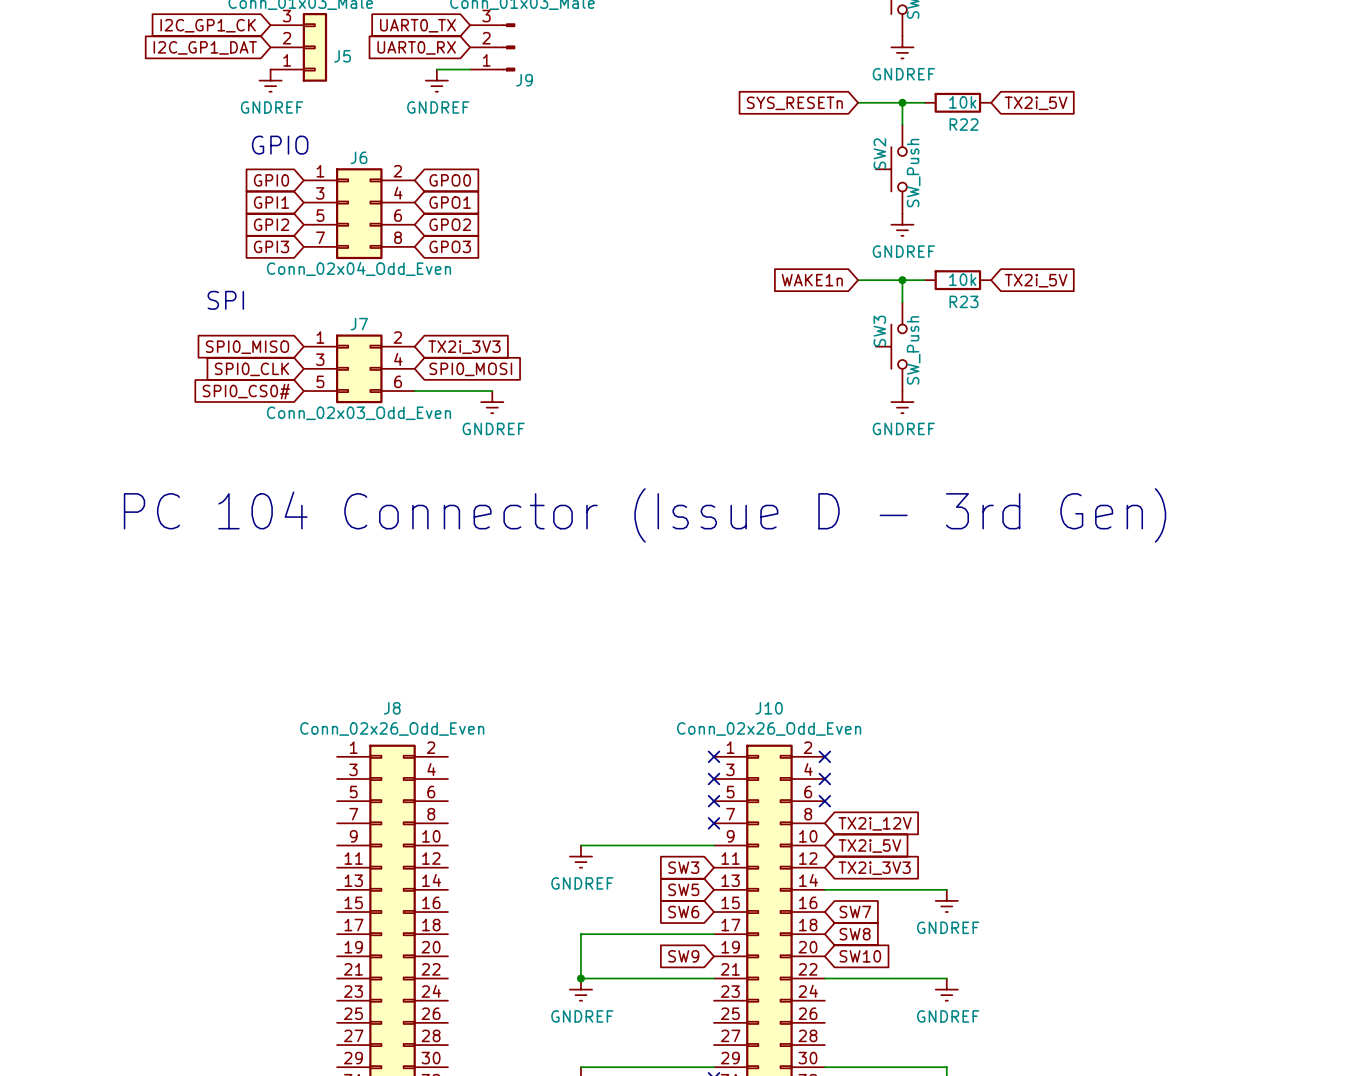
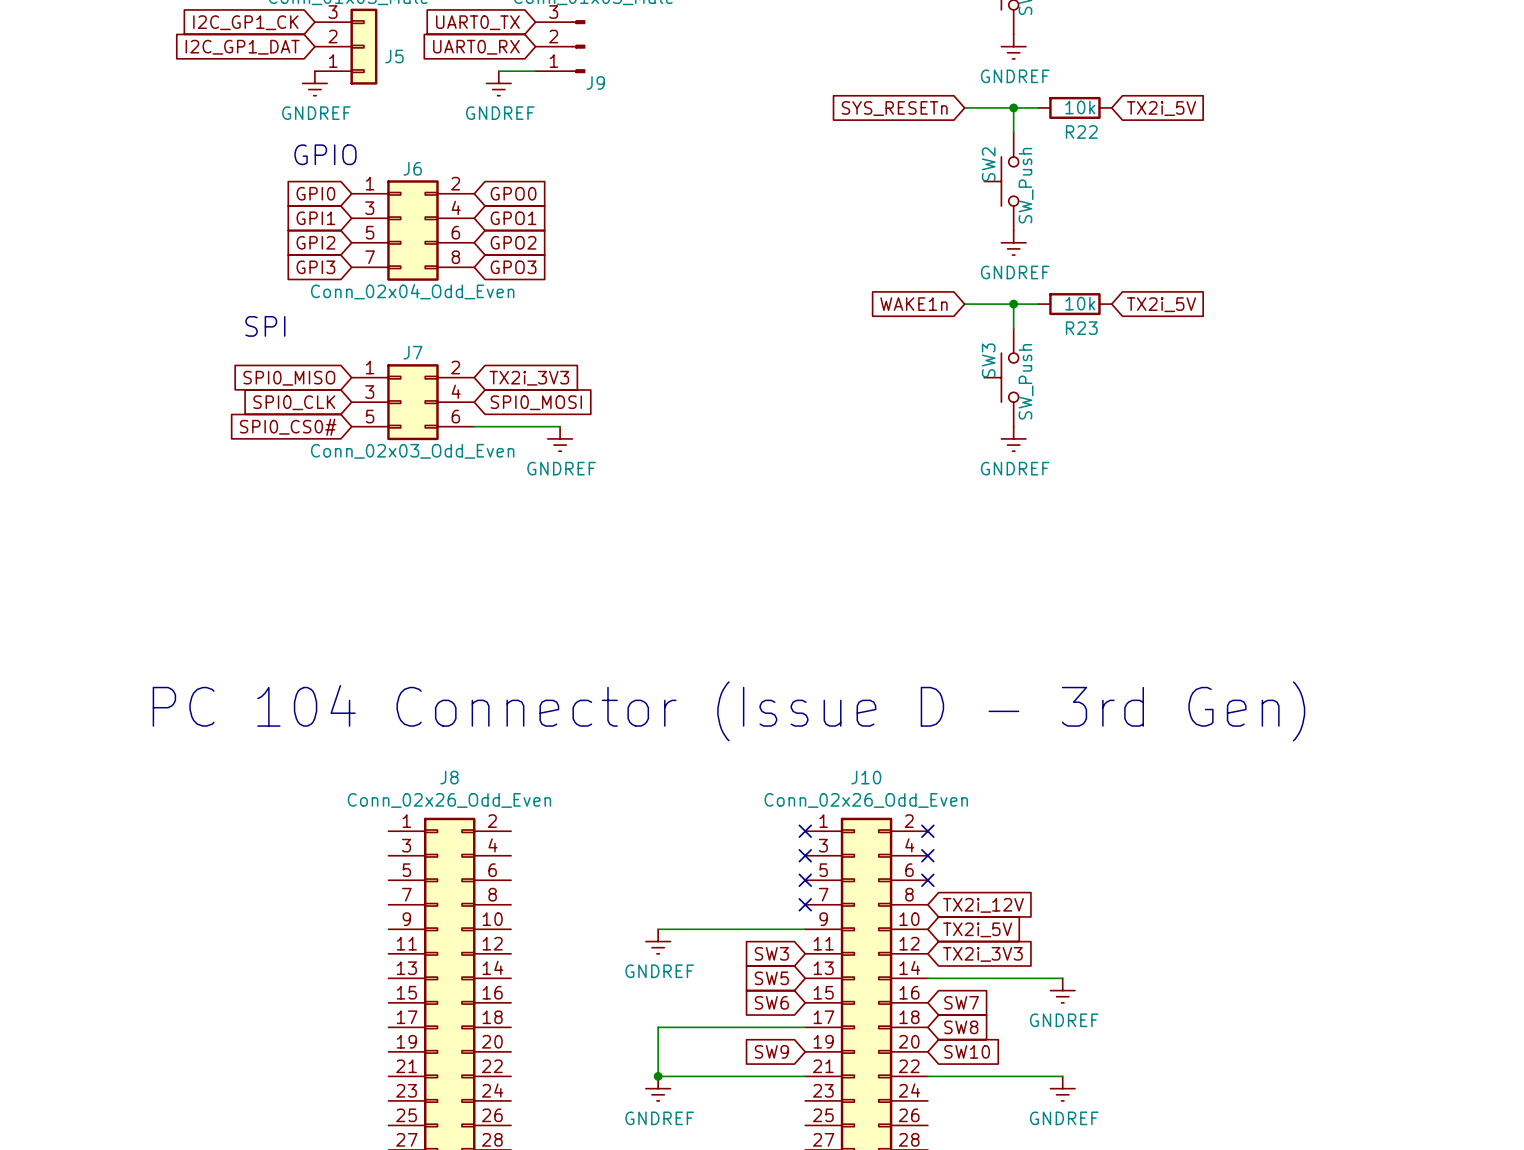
text position: PC 104 Connector (Issue D - 3rd Gen) (645, 515) -> PC 104 Connector (Issue D - 3rd Gen) (728, 711)

